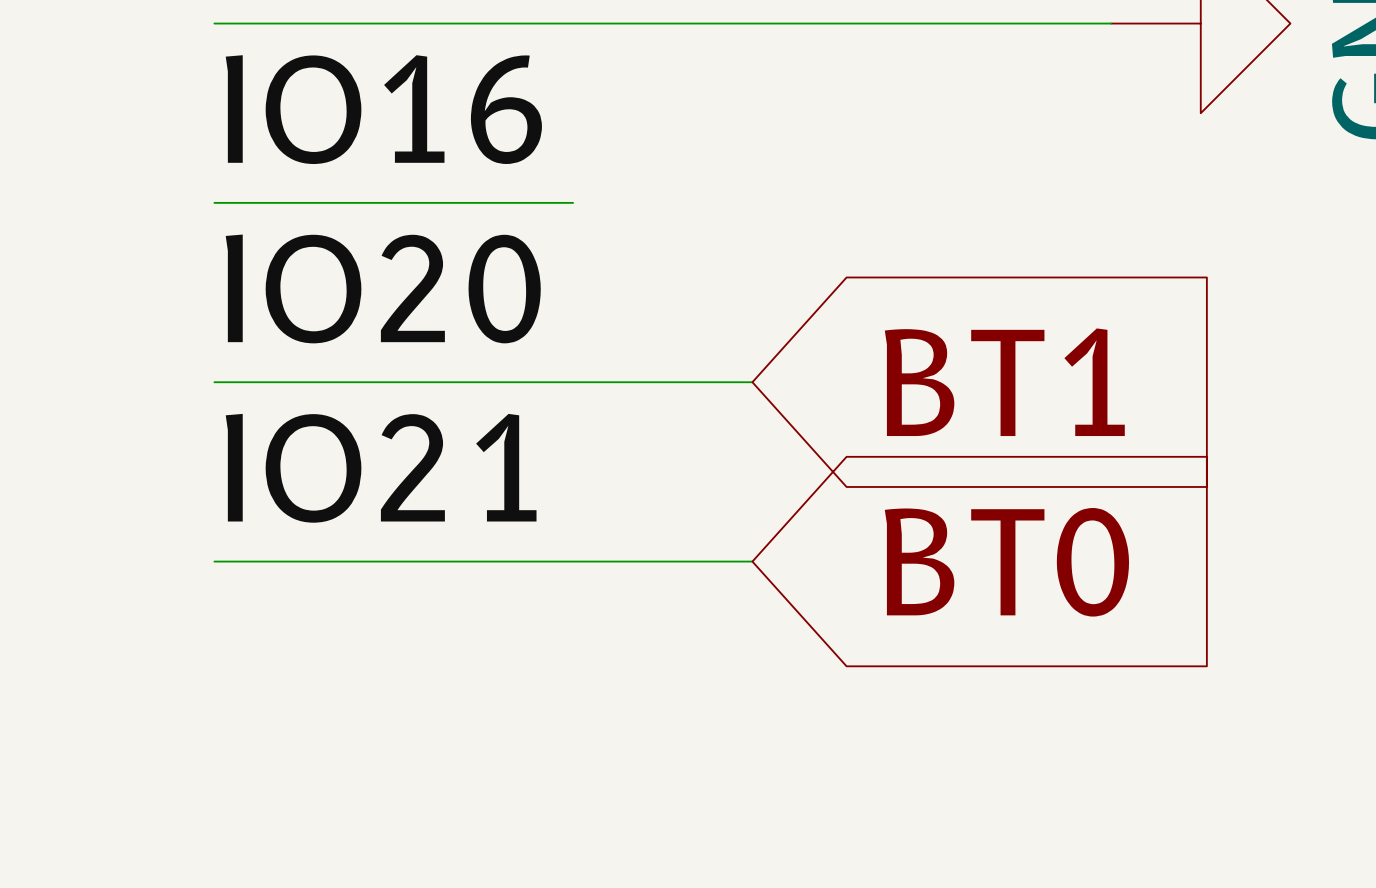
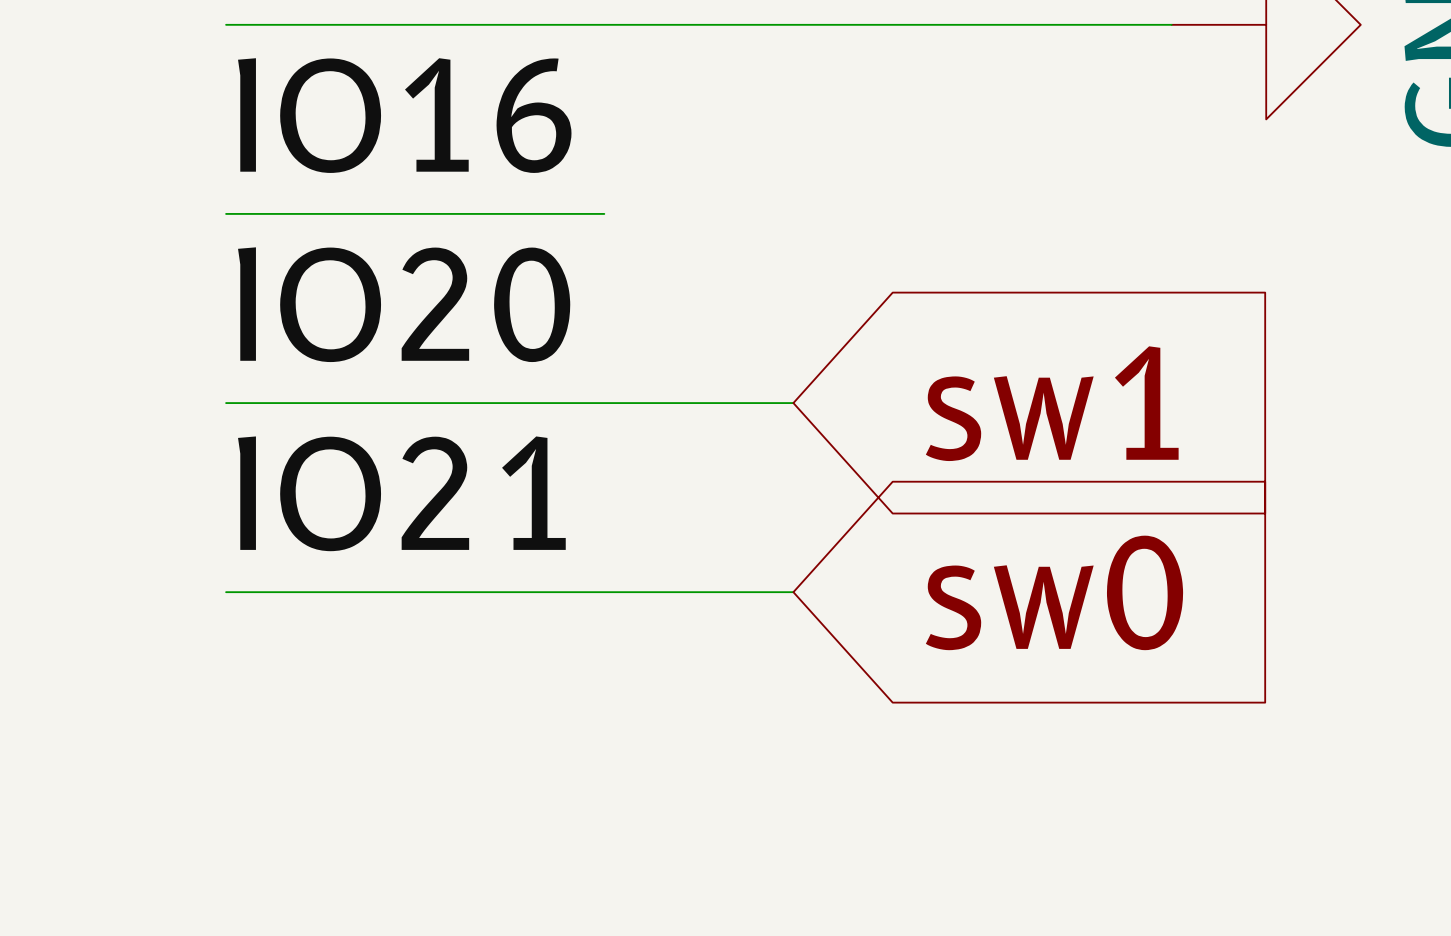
global label: BT1 (1004, 382) -> sw1 (1052, 403)
global label: BT0 (1006, 562) -> sw0 (1054, 592)

